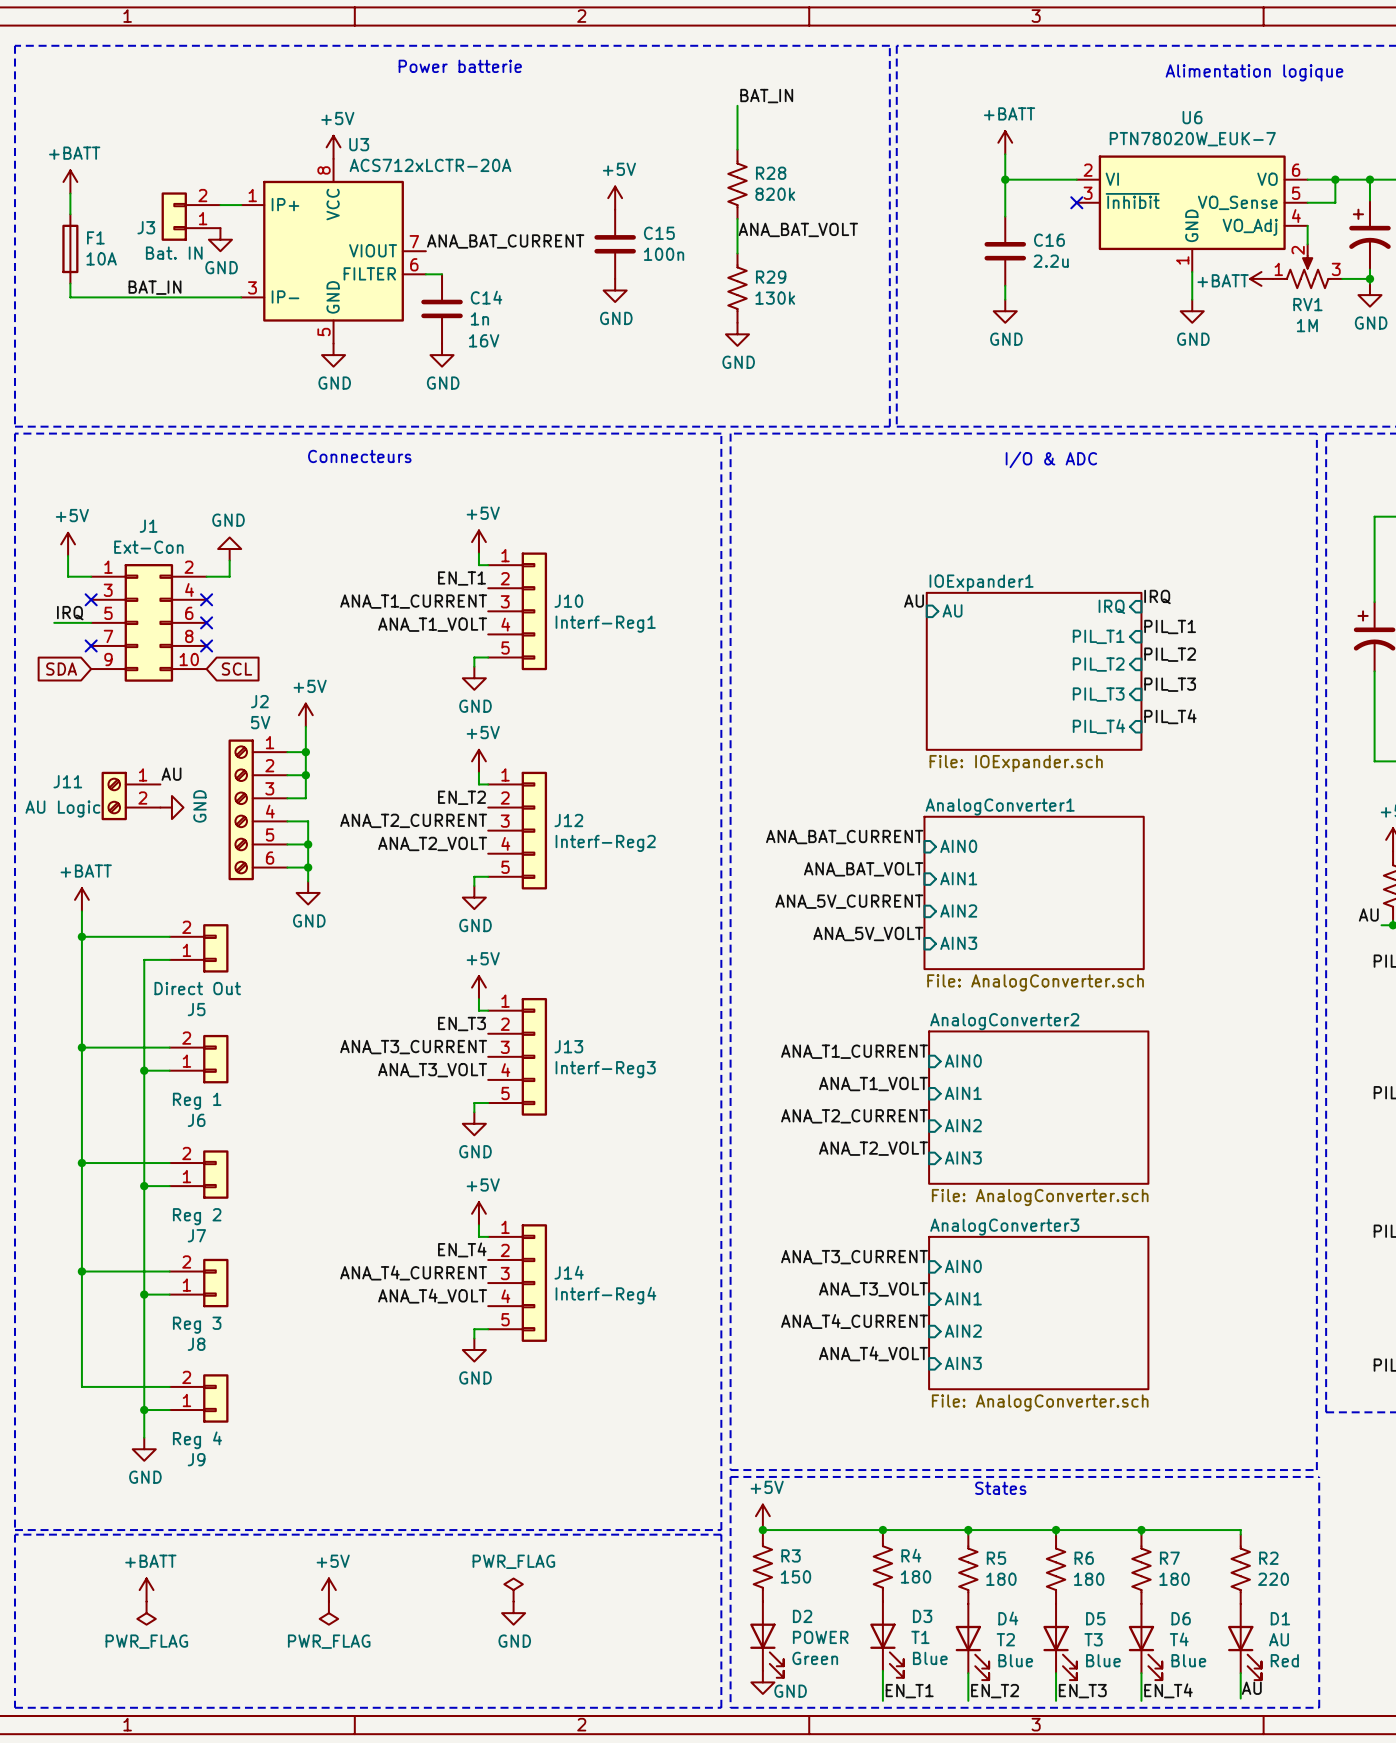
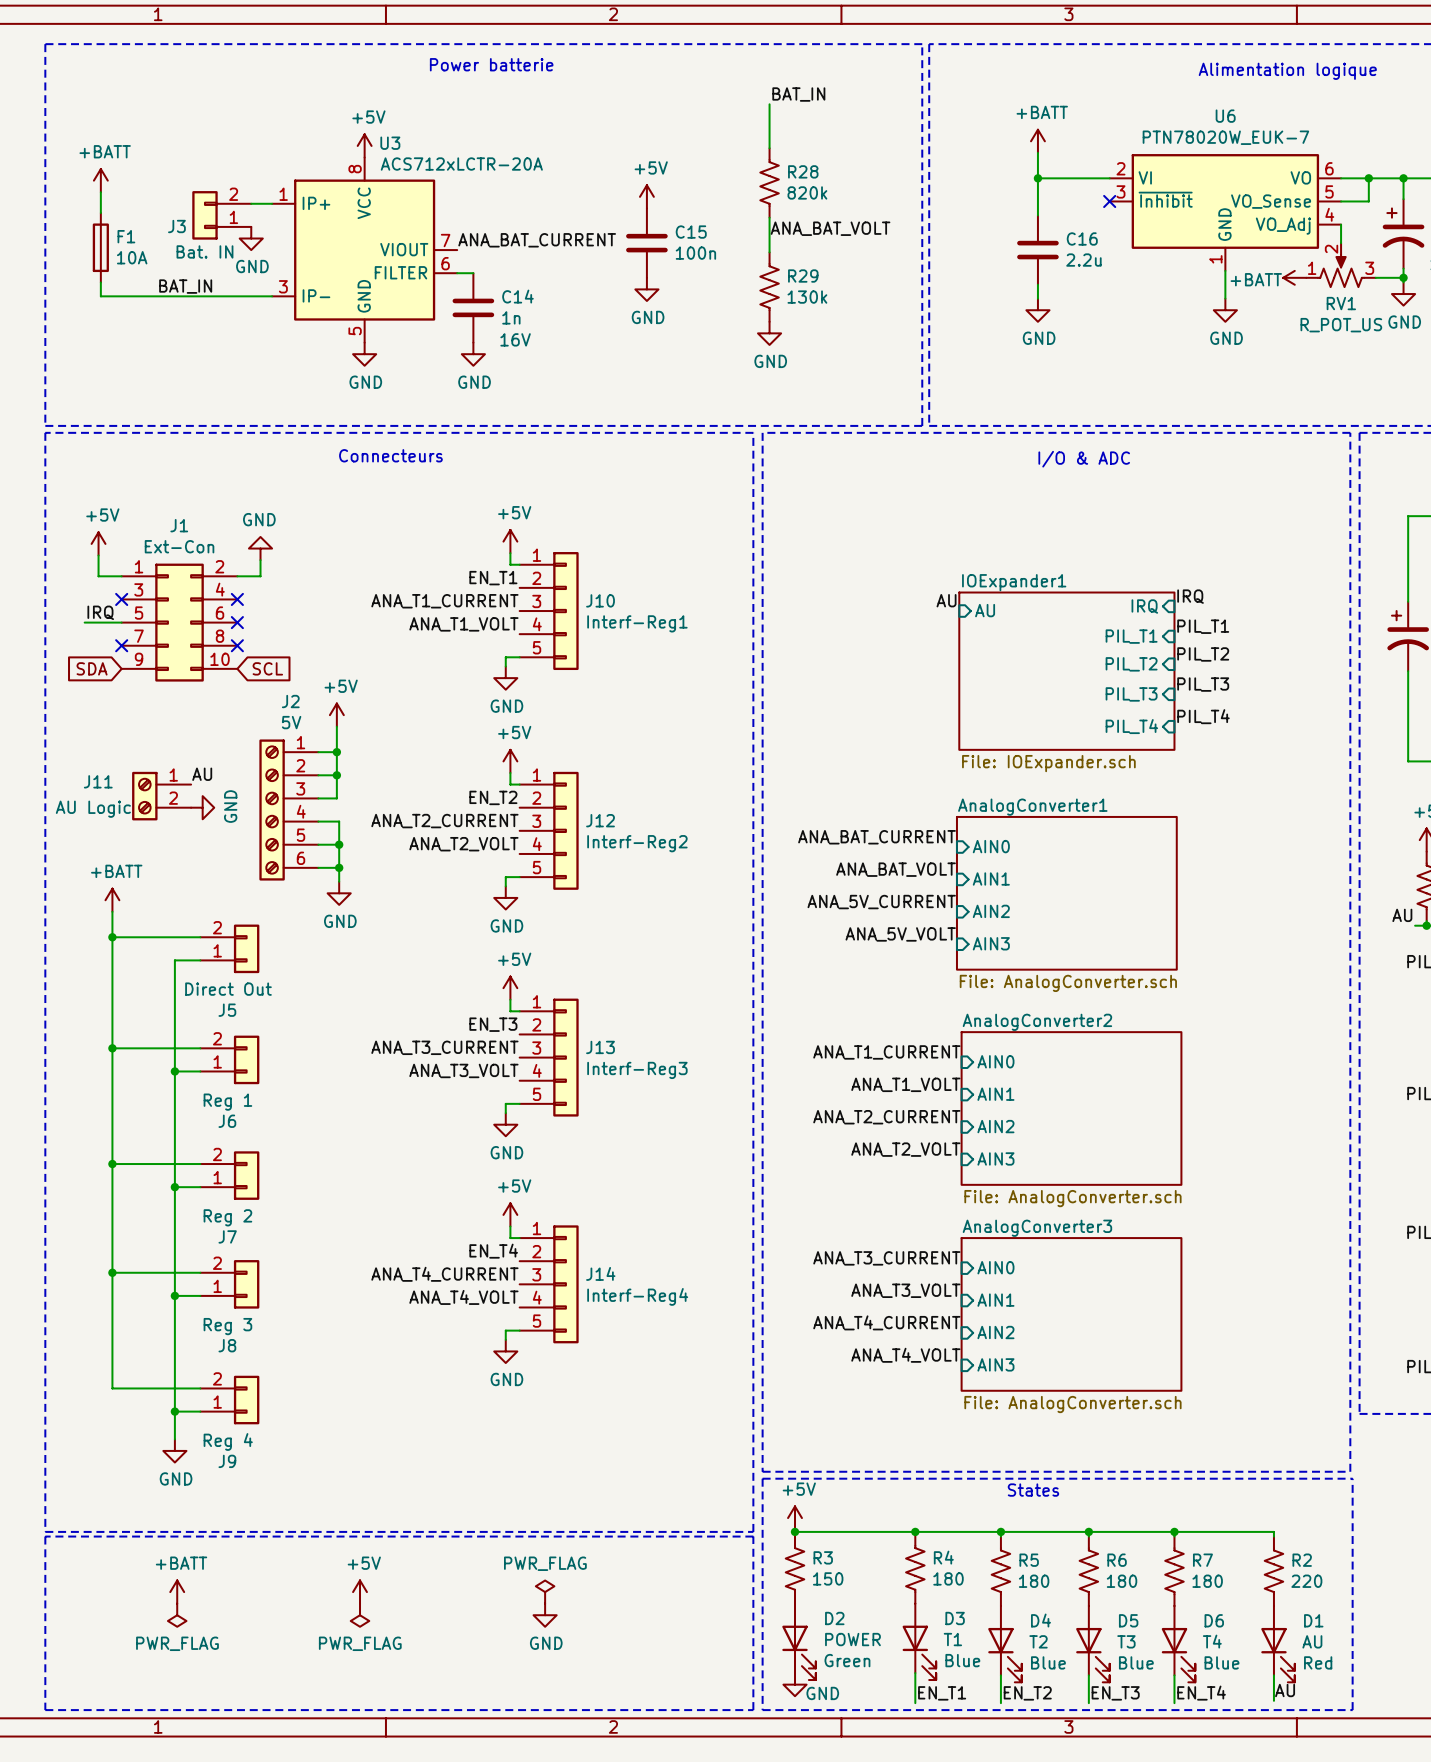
RV1 value: 1M (1307, 325) -> R_POT_US (1341, 325)

